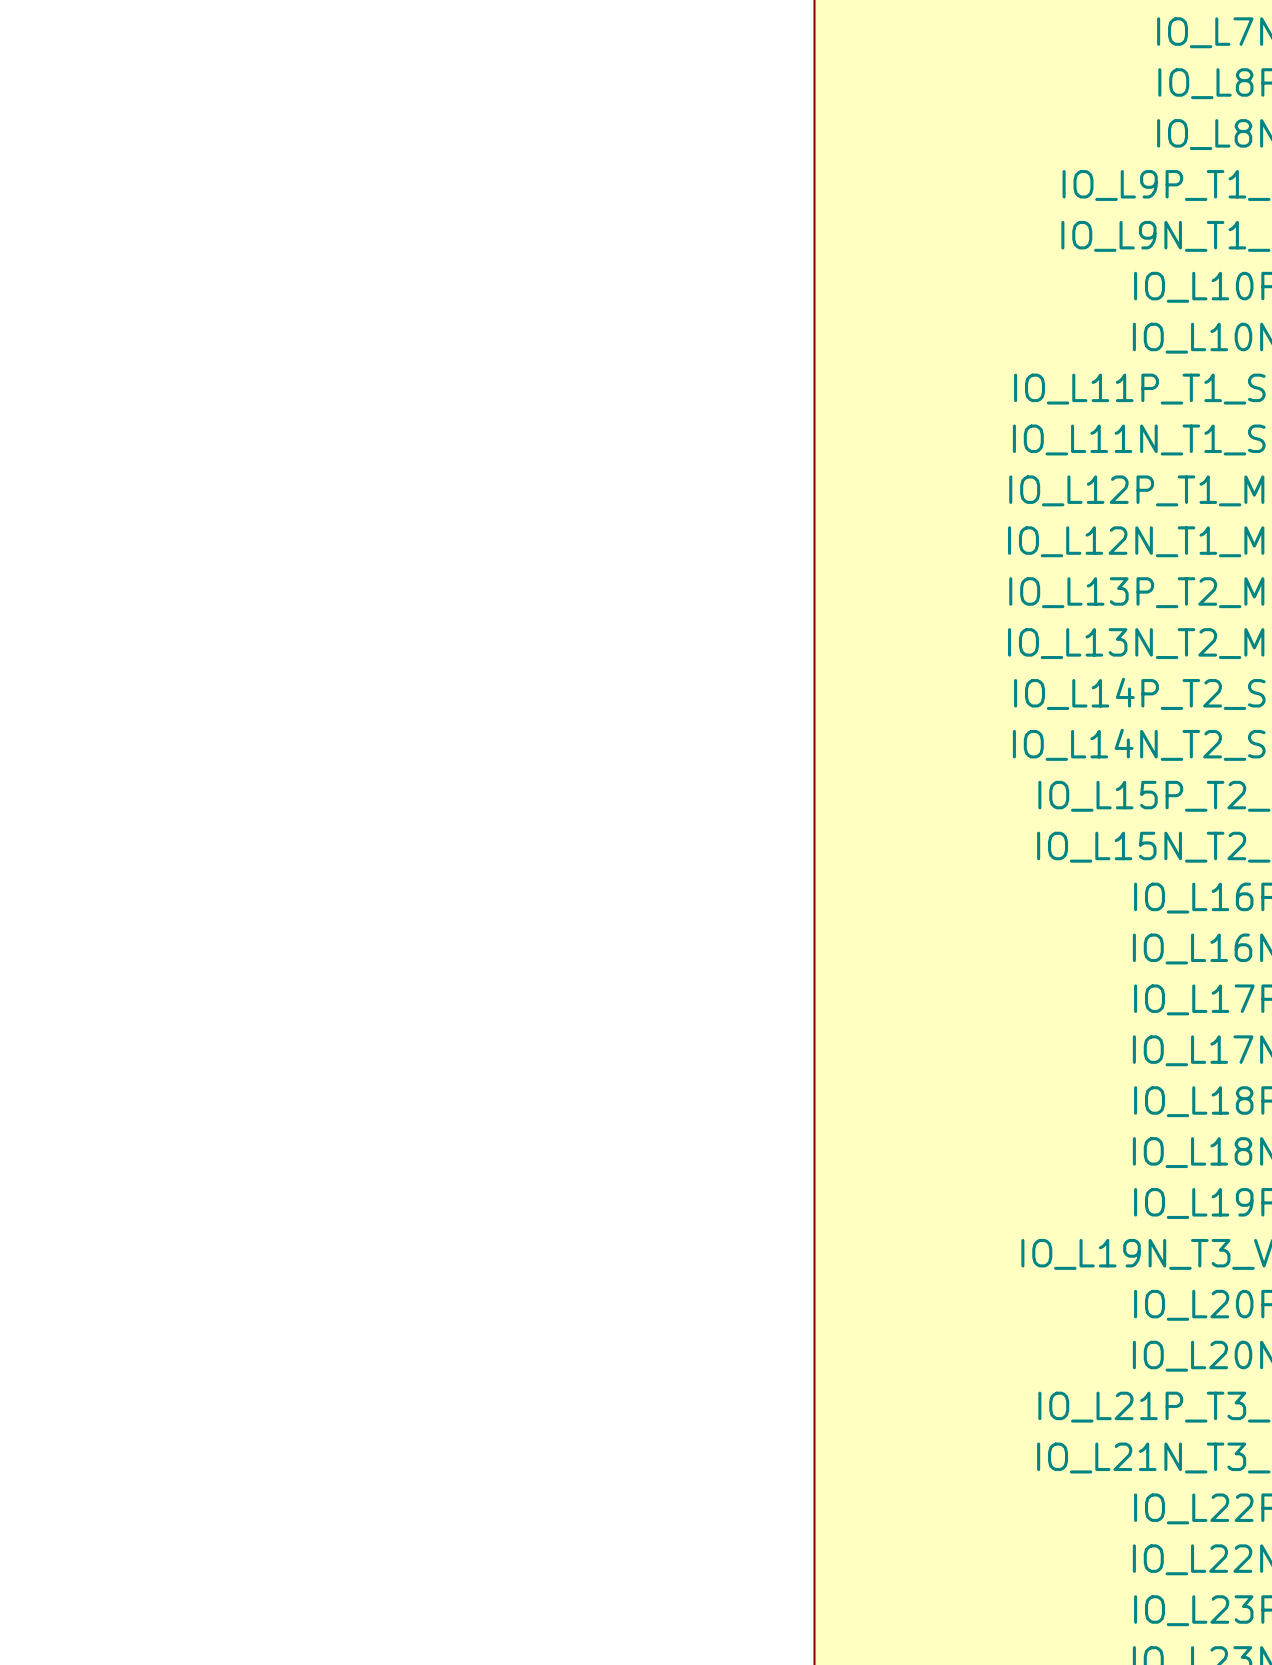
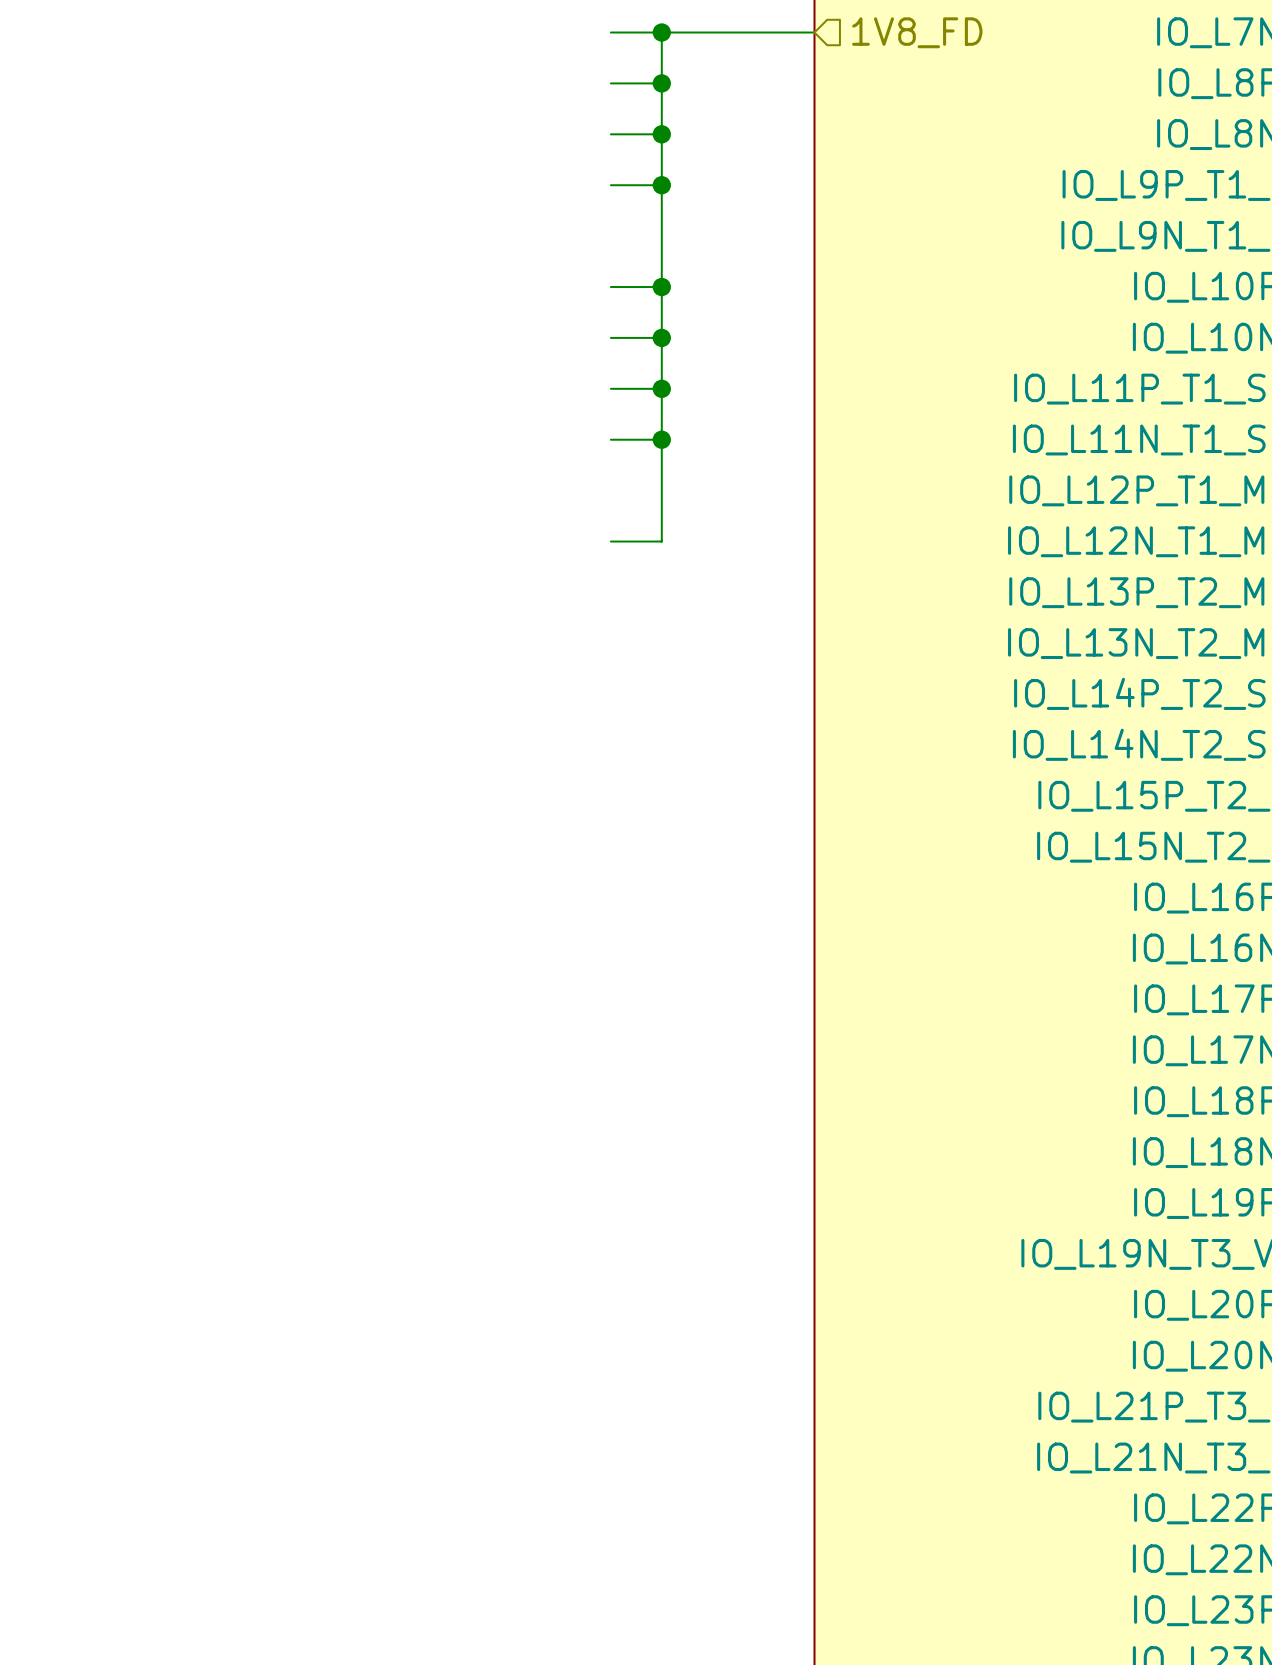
wire: none -> (610, 32) (814, 32)
wire: none -> (661, 32) (661, 541) (610, 541)
junction: none -> (661, 32)
hierarchical label: none -> 1V8_FD (917, 32)
wire: none -> (610, 83) (661, 83)
junction: none -> (661, 83)
wire: none -> (610, 134) (661, 134)
junction: none -> (661, 134)
wire: none -> (610, 185) (661, 185)
junction: none -> (661, 185)
wire: none -> (610, 287) (661, 287)
junction: none -> (661, 287)
wire: none -> (610, 337) (661, 337)
junction: none -> (661, 337)
wire: none -> (610, 388) (661, 388)
junction: none -> (661, 388)
wire: none -> (610, 439) (661, 439)
junction: none -> (661, 439)

